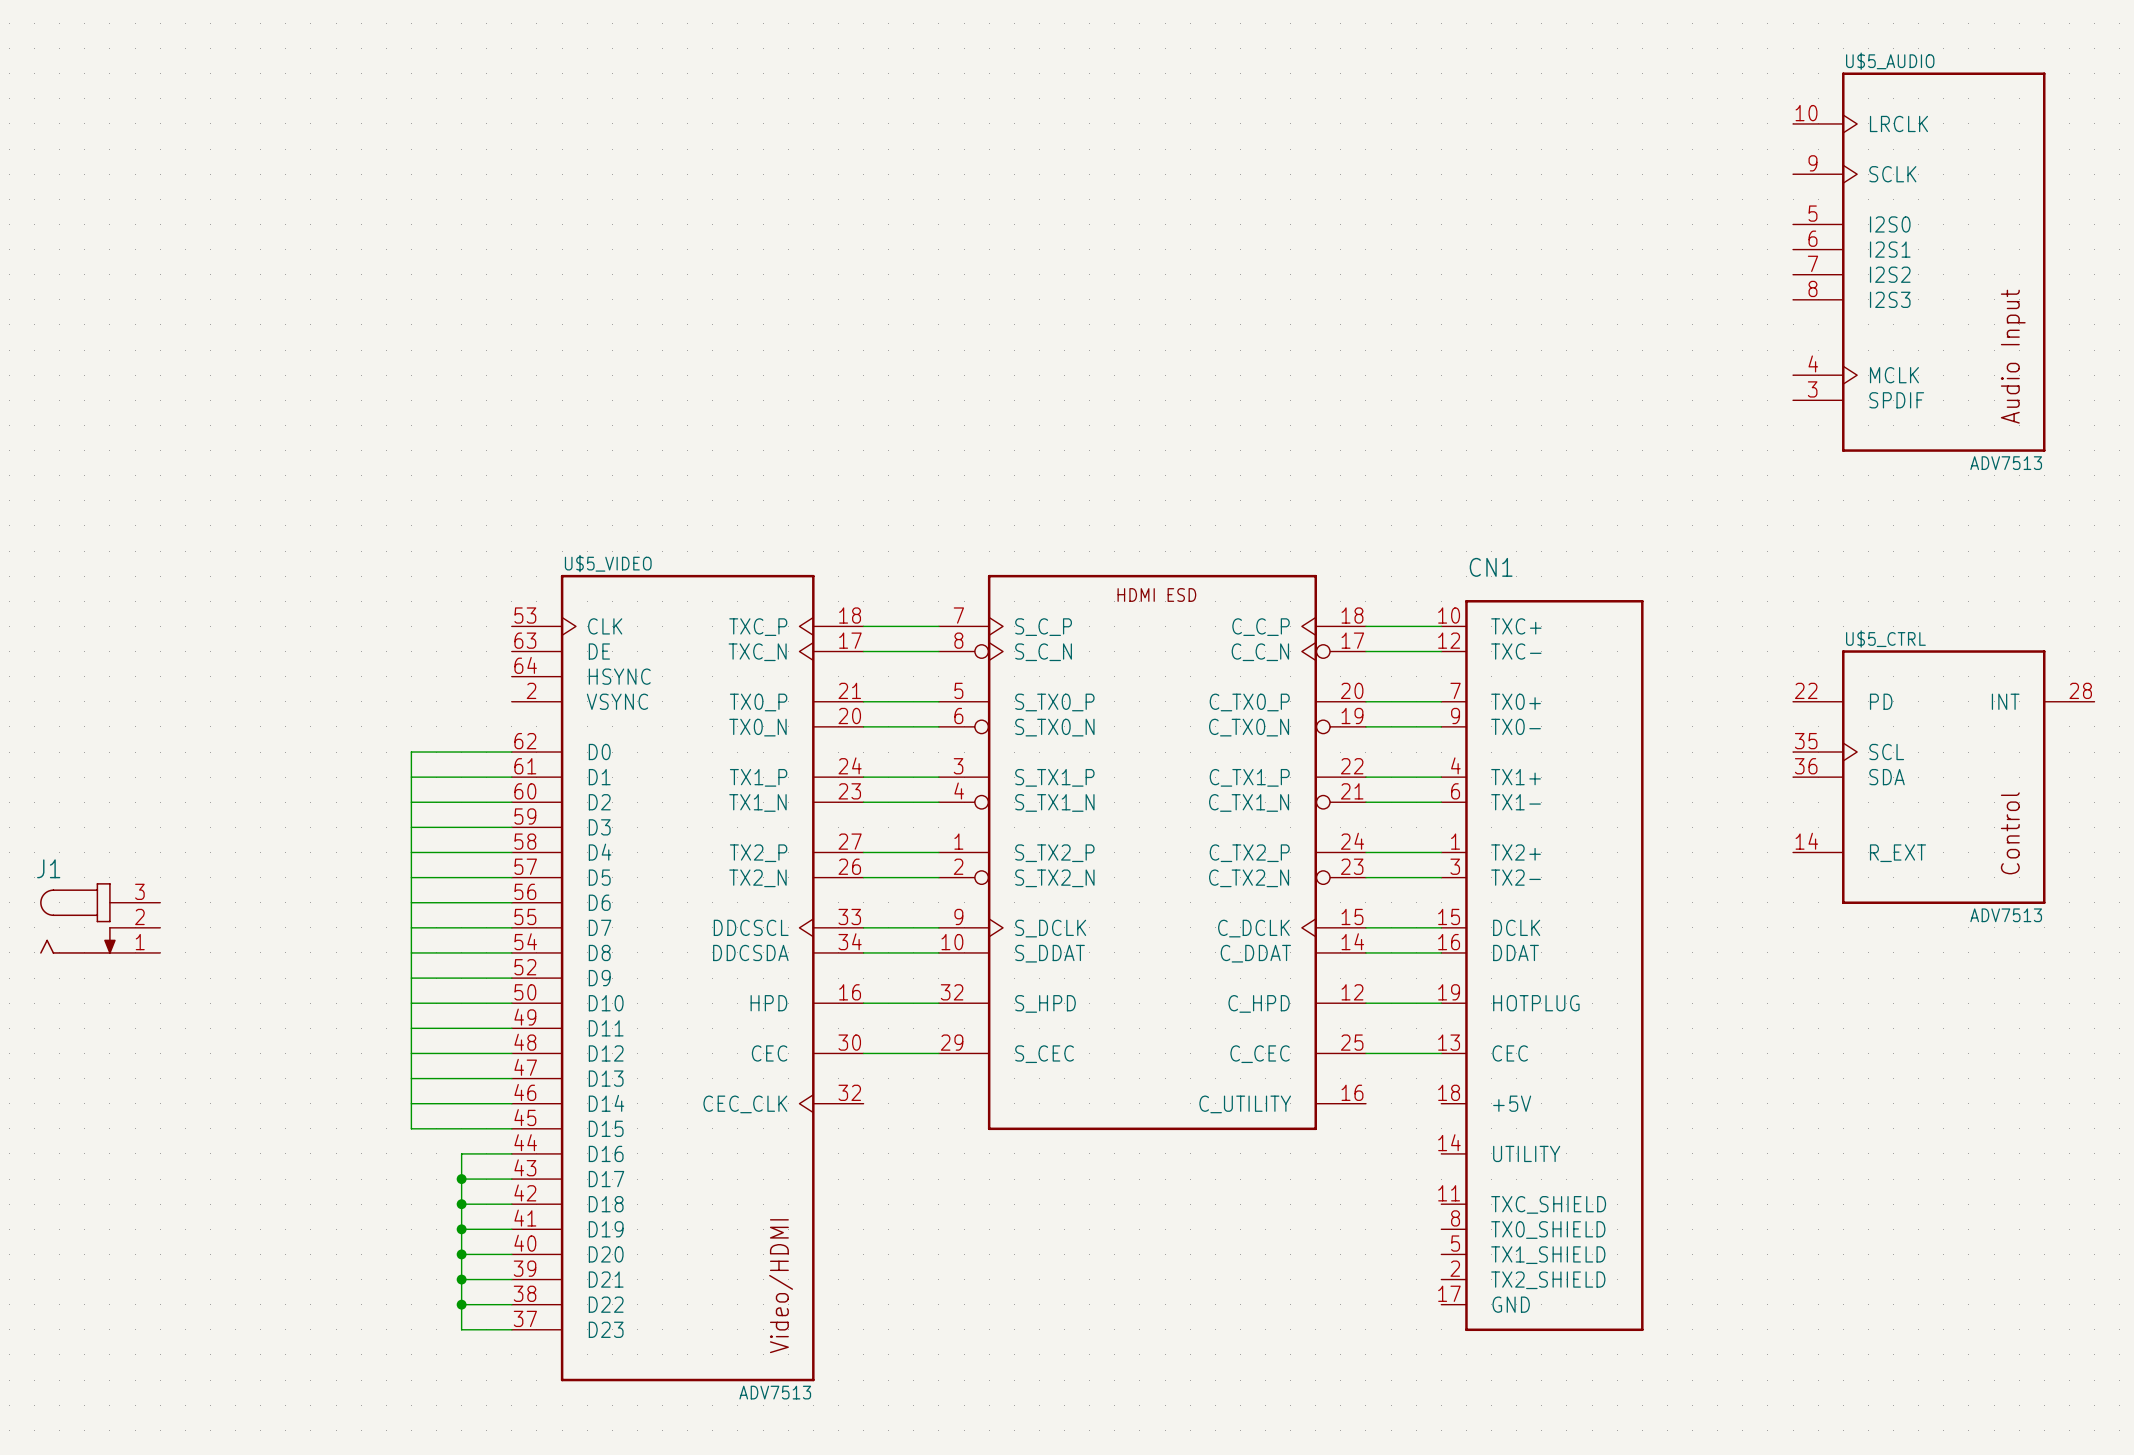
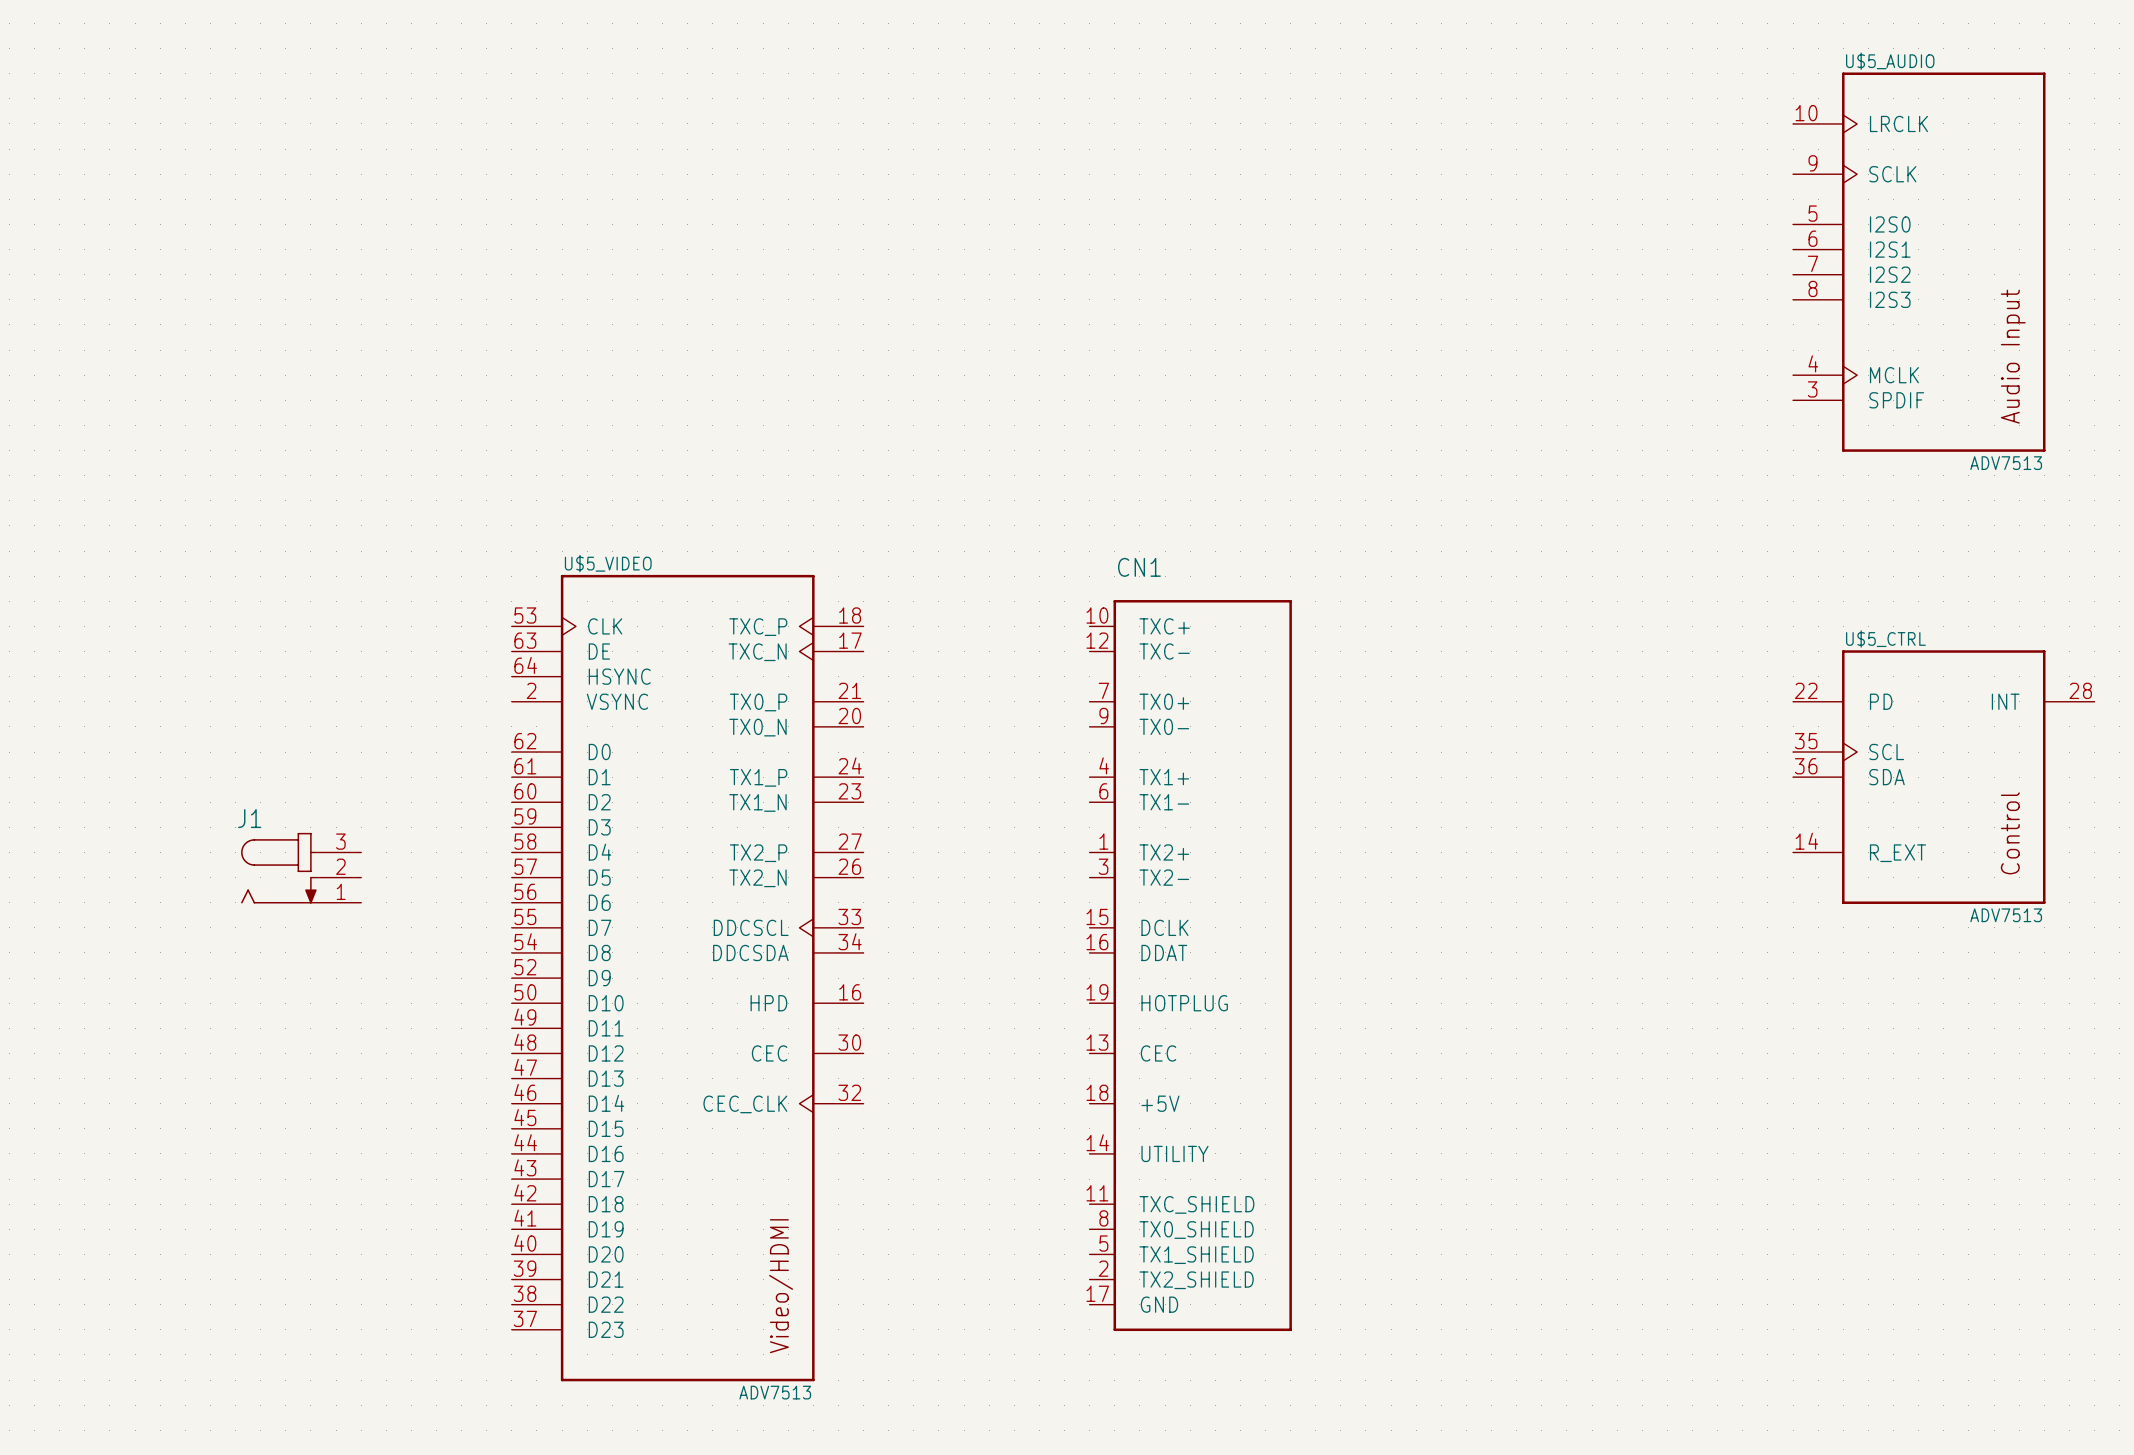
wire: (863, 626) (938, 626) -> none
wire: (1365, 626) (1441, 626) -> none
wire: (863, 651) (938, 651) -> none
wire: (1365, 651) (1441, 651) -> none
wire: (863, 701) (938, 701) -> none
wire: (1365, 701) (1441, 701) -> none
wire: (863, 726) (938, 726) -> none
wire: (1365, 726) (1441, 726) -> none
wire: (511, 752) (411, 752) (411, 1128) (511, 1128) -> none
wire: (411, 777) (511, 777) -> none
wire: (863, 777) (938, 777) -> none
wire: (1365, 777) (1441, 777) -> none
wire: (411, 802) (511, 802) -> none
wire: (863, 802) (938, 802) -> none
wire: (1365, 802) (1441, 802) -> none
wire: (411, 827) (511, 827) -> none
wire: (411, 852) (511, 852) -> none
wire: (863, 852) (938, 852) -> none
part: (1152, 852) -> none
wire: (1365, 852) (1441, 852) -> none
wire: (411, 877) (511, 877) -> none
wire: (863, 877) (938, 877) -> none
wire: (1365, 877) (1441, 877) -> none
wire: (411, 902) (511, 902) -> none
J1 position: (100, 918) -> (301, 868)
wire: (411, 927) (511, 927) -> none
wire: (863, 927) (938, 927) -> none
wire: (1365, 927) (1441, 927) -> none
wire: (411, 952) (511, 952) -> none
wire: (863, 952) (938, 952) -> none
wire: (1365, 952) (1441, 952) -> none
CN1 position: (1542, 965) -> (1190, 965)
wire: (411, 978) (511, 978) -> none
wire: (411, 1003) (511, 1003) -> none
wire: (863, 1003) (938, 1003) -> none
wire: (1365, 1003) (1441, 1003) -> none
wire: (411, 1028) (511, 1028) -> none
wire: (411, 1053) (511, 1053) -> none
wire: (863, 1053) (938, 1053) -> none
wire: (1365, 1053) (1441, 1053) -> none
wire: (411, 1078) (511, 1078) -> none
wire: (411, 1103) (511, 1103) -> none
wire: (511, 1153) (461, 1153) (461, 1329) (511, 1329) -> none
wire: (461, 1179) (511, 1179) -> none
junction: (461, 1179) -> none
wire: (461, 1204) (511, 1204) -> none
junction: (461, 1204) -> none
wire: (461, 1229) (511, 1229) -> none
junction: (461, 1229) -> none
wire: (461, 1254) (511, 1254) -> none
junction: (461, 1254) -> none
wire: (461, 1279) (511, 1279) -> none
junction: (461, 1279) -> none
wire: (461, 1304) (511, 1304) -> none
junction: (461, 1304) -> none

